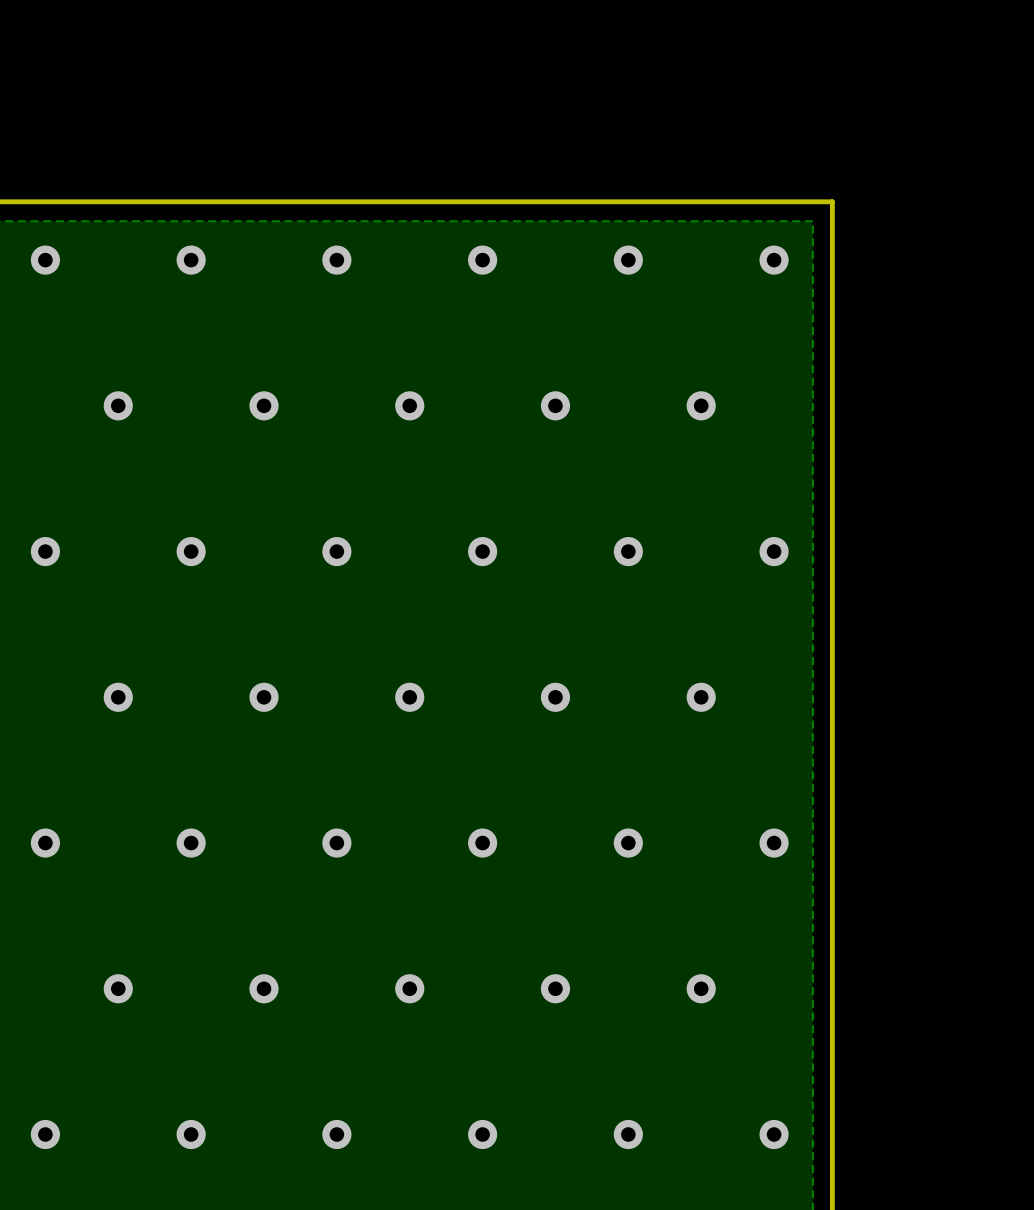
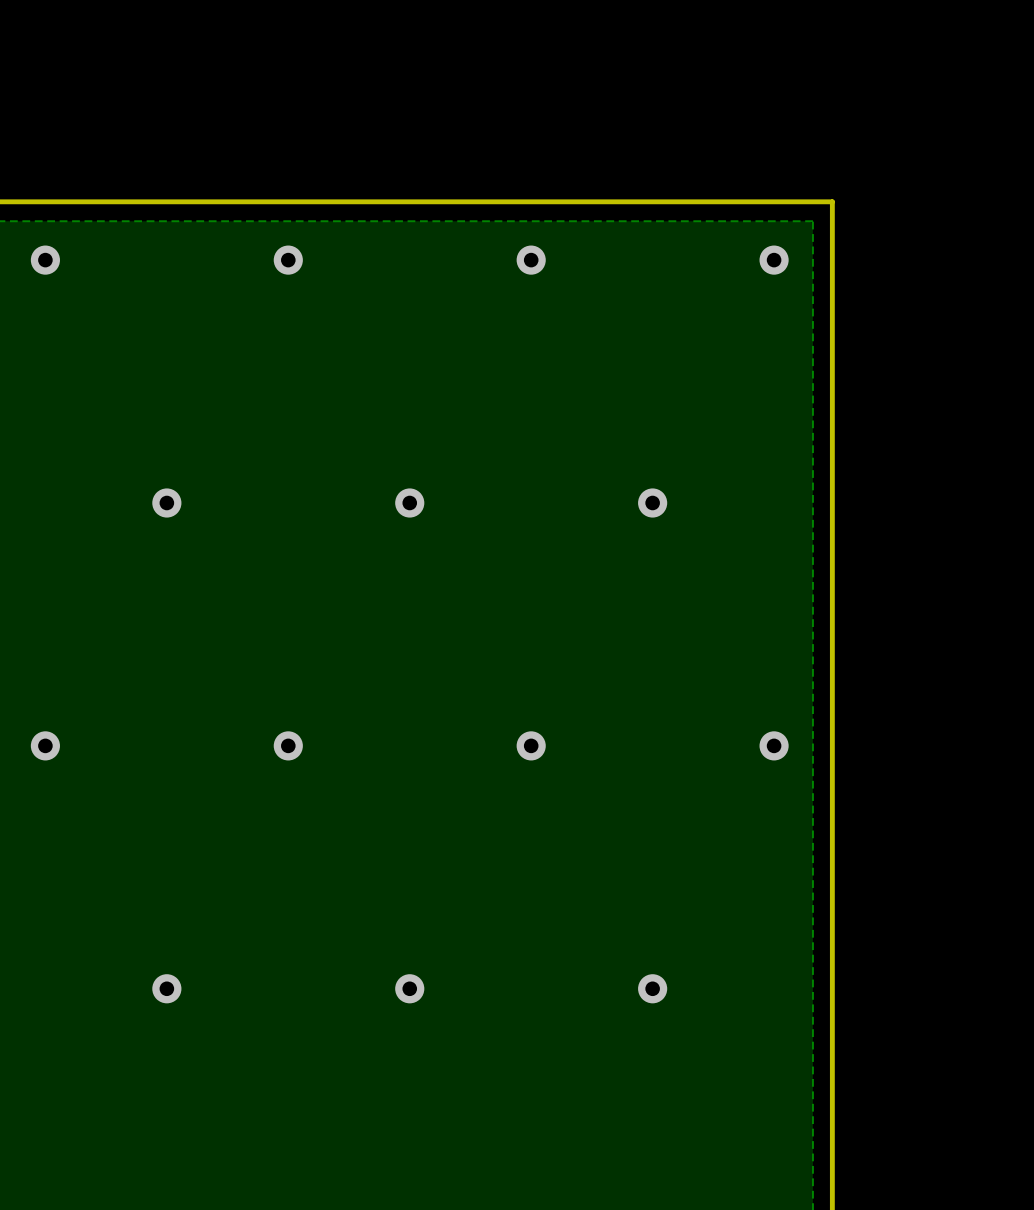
via: (191, 260) -> none
via: none -> (288, 260)
via: (336, 260) -> none
via: (482, 260) -> none
via: none -> (531, 260)
via: (628, 260) -> none
via: (118, 405) -> none
via: (264, 405) -> none
via: (409, 405) -> none
via: (555, 405) -> none
via: (701, 405) -> none
via: none -> (166, 502)
via: none -> (409, 502)
via: none -> (652, 502)
via: (45, 551) -> none
via: (191, 551) -> none
via: (336, 551) -> none
via: (482, 551) -> none
via: (628, 551) -> none
via: (774, 551) -> none
via: (118, 697) -> none
via: (264, 697) -> none
via: (409, 697) -> none
via: (555, 697) -> none
via: (701, 697) -> none
via: none -> (45, 745)
via: none -> (288, 745)
via: none -> (531, 745)
via: none -> (774, 745)
via: (45, 843) -> none
via: (191, 843) -> none
via: (336, 843) -> none
via: (482, 843) -> none
via: (628, 843) -> none
via: (774, 843) -> none
via: (118, 988) -> none
via: none -> (166, 988)
via: (264, 988) -> none
via: (555, 988) -> none
via: none -> (652, 988)
via: (701, 988) -> none
via: (45, 1134) -> none
via: (191, 1134) -> none
via: (336, 1134) -> none
via: (482, 1134) -> none
via: (628, 1134) -> none
via: (774, 1134) -> none

